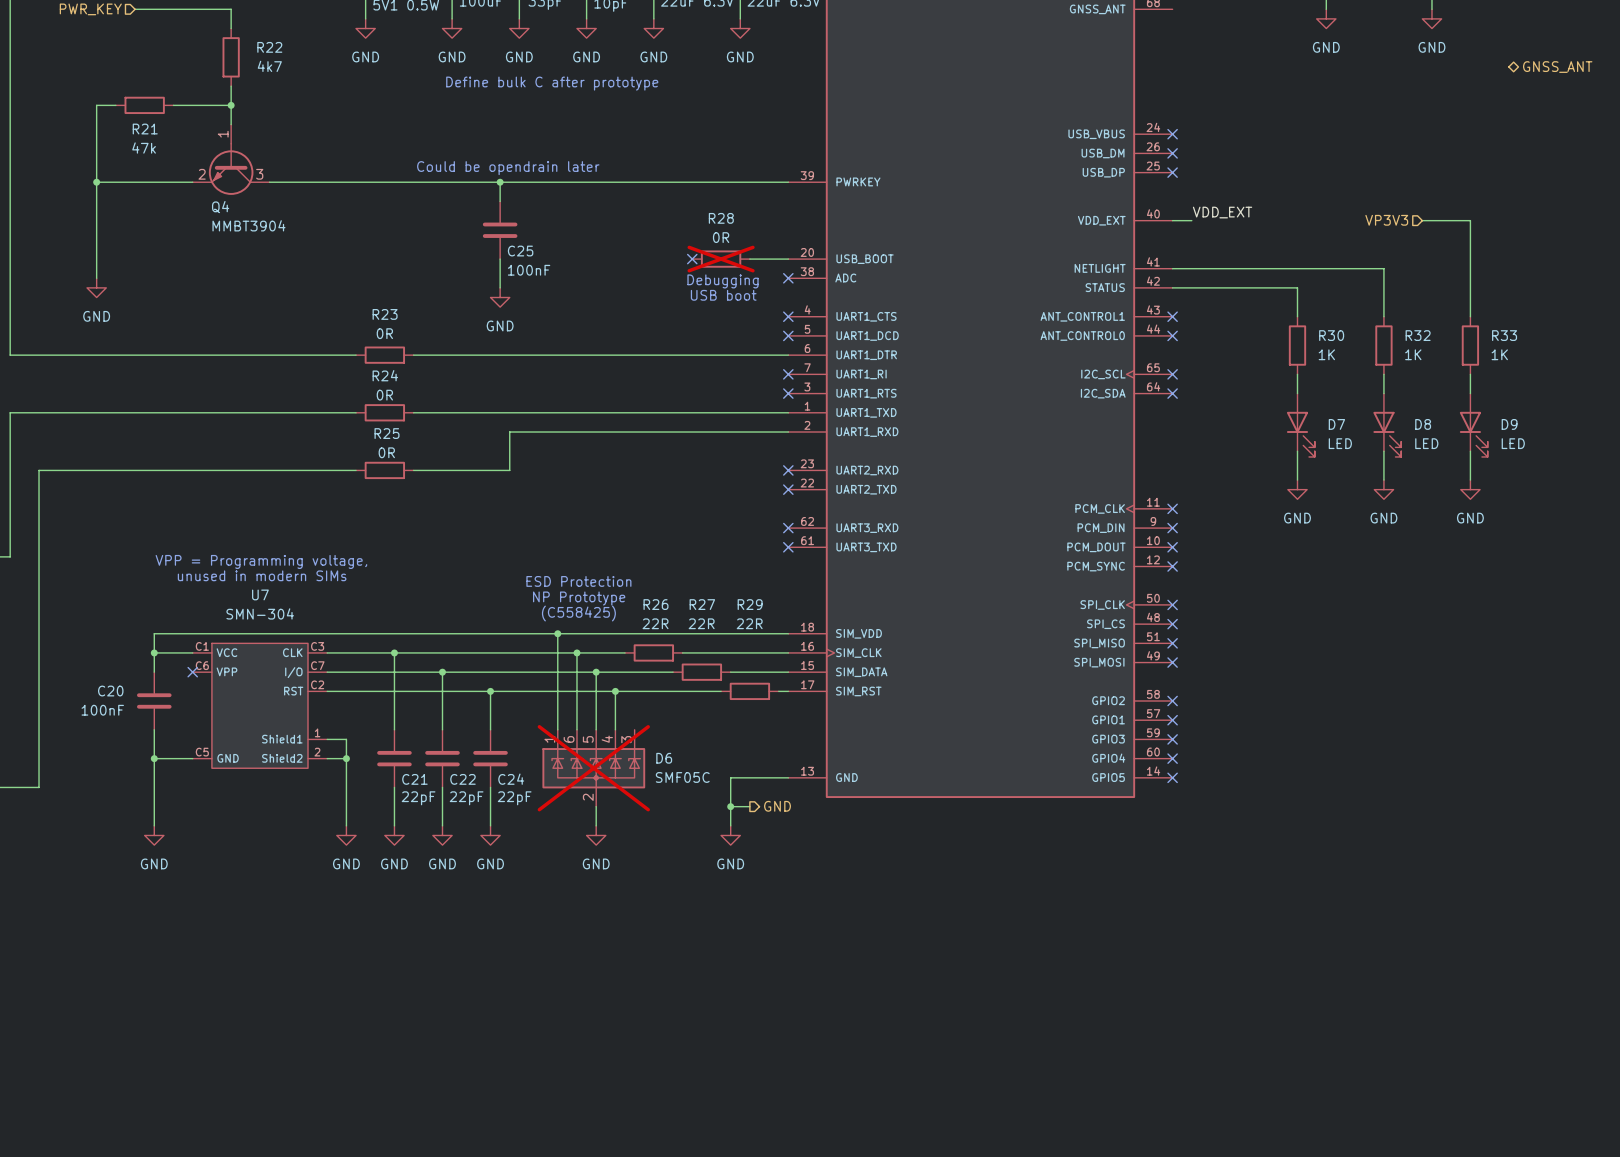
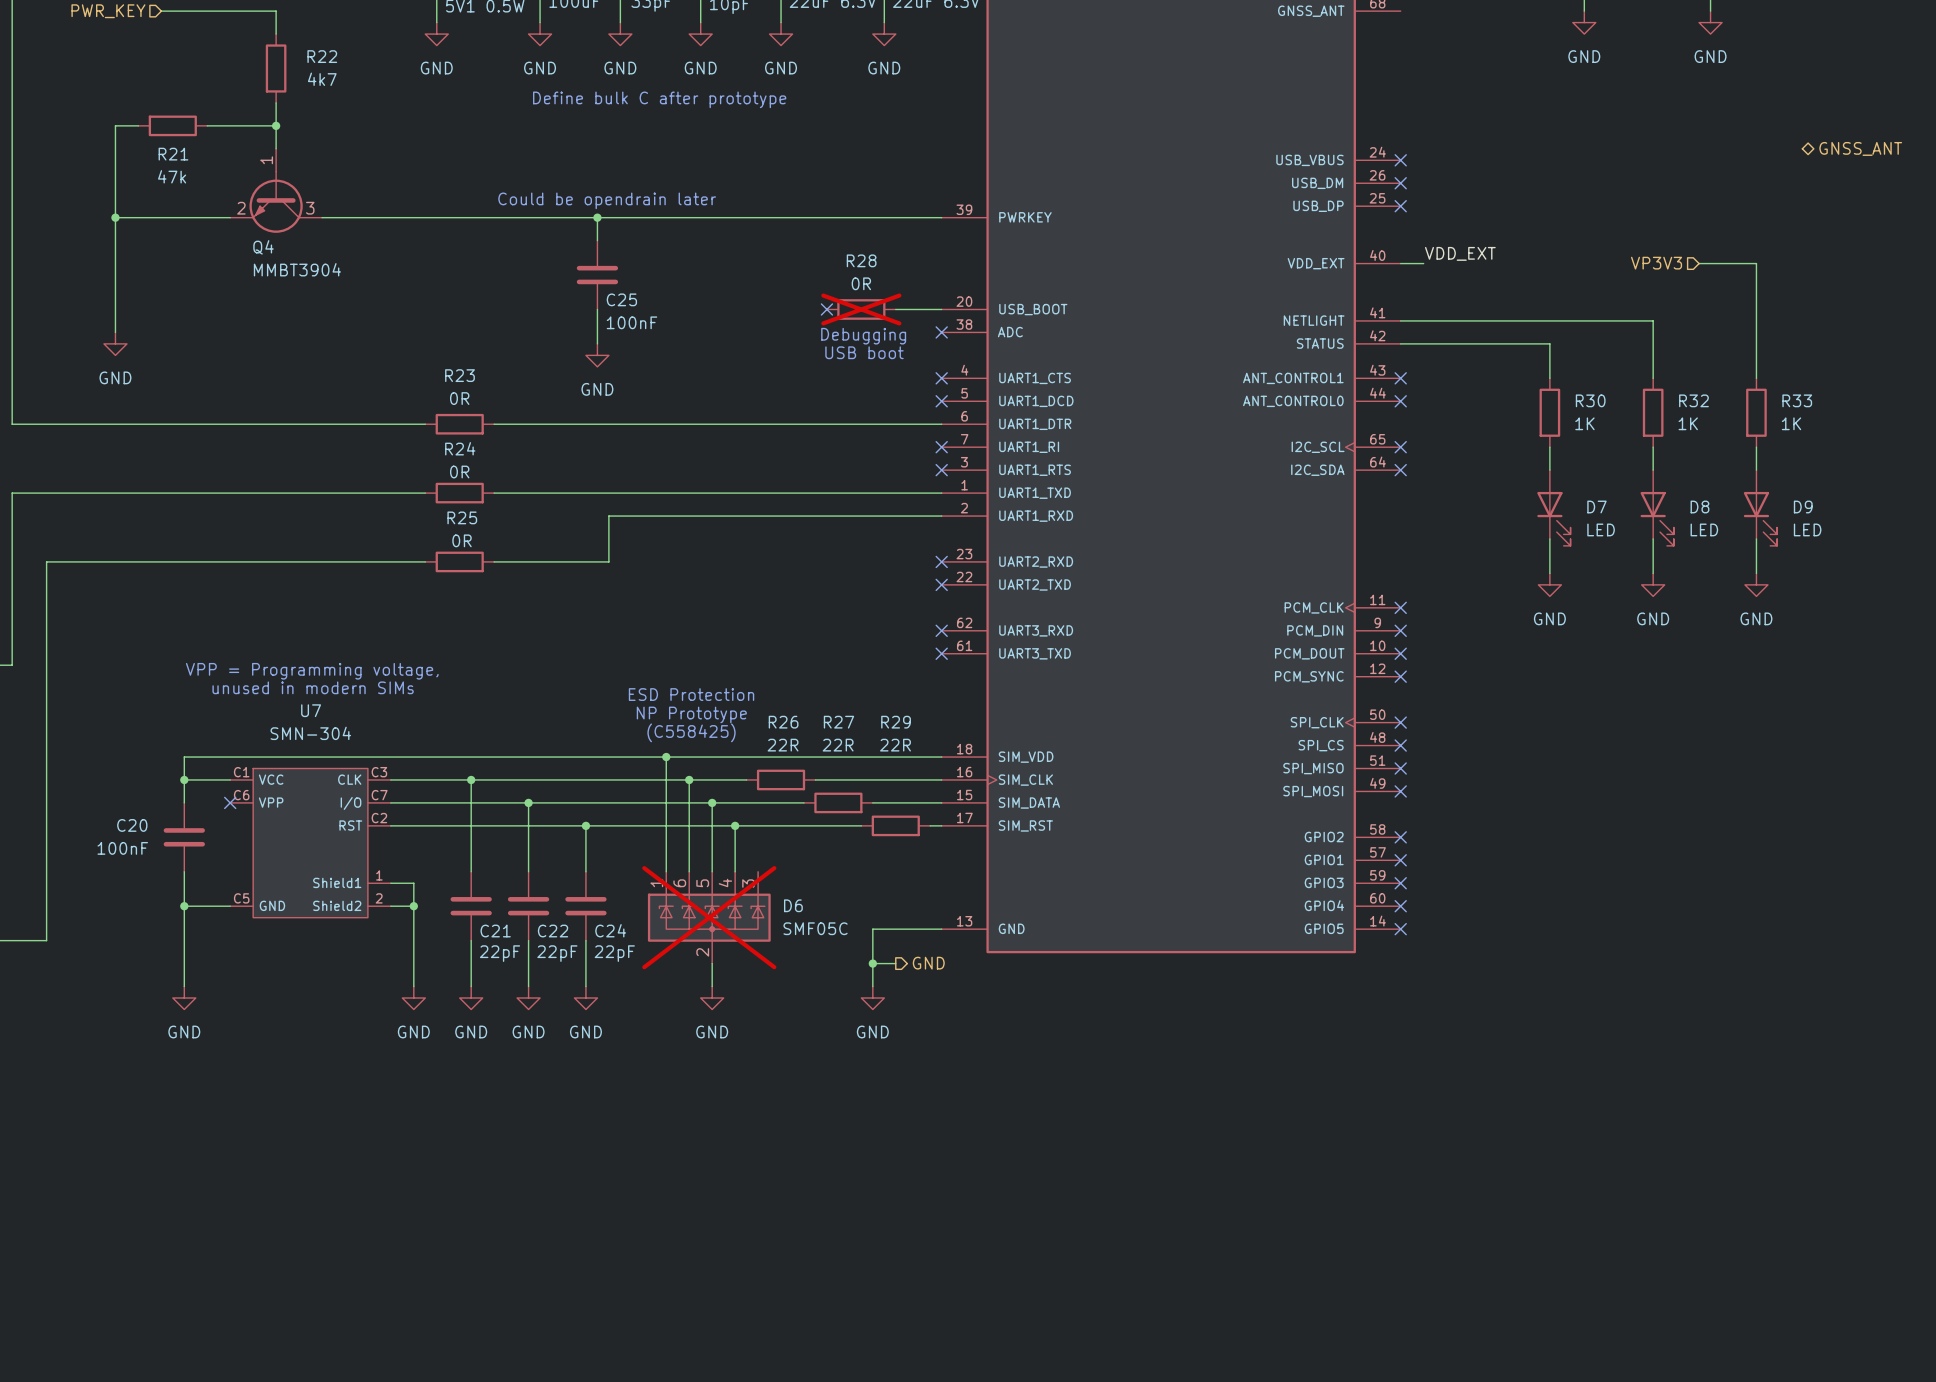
hierarchical label position: GNSS_ANT (1557, 67) -> GNSS_ANT (1860, 148)

